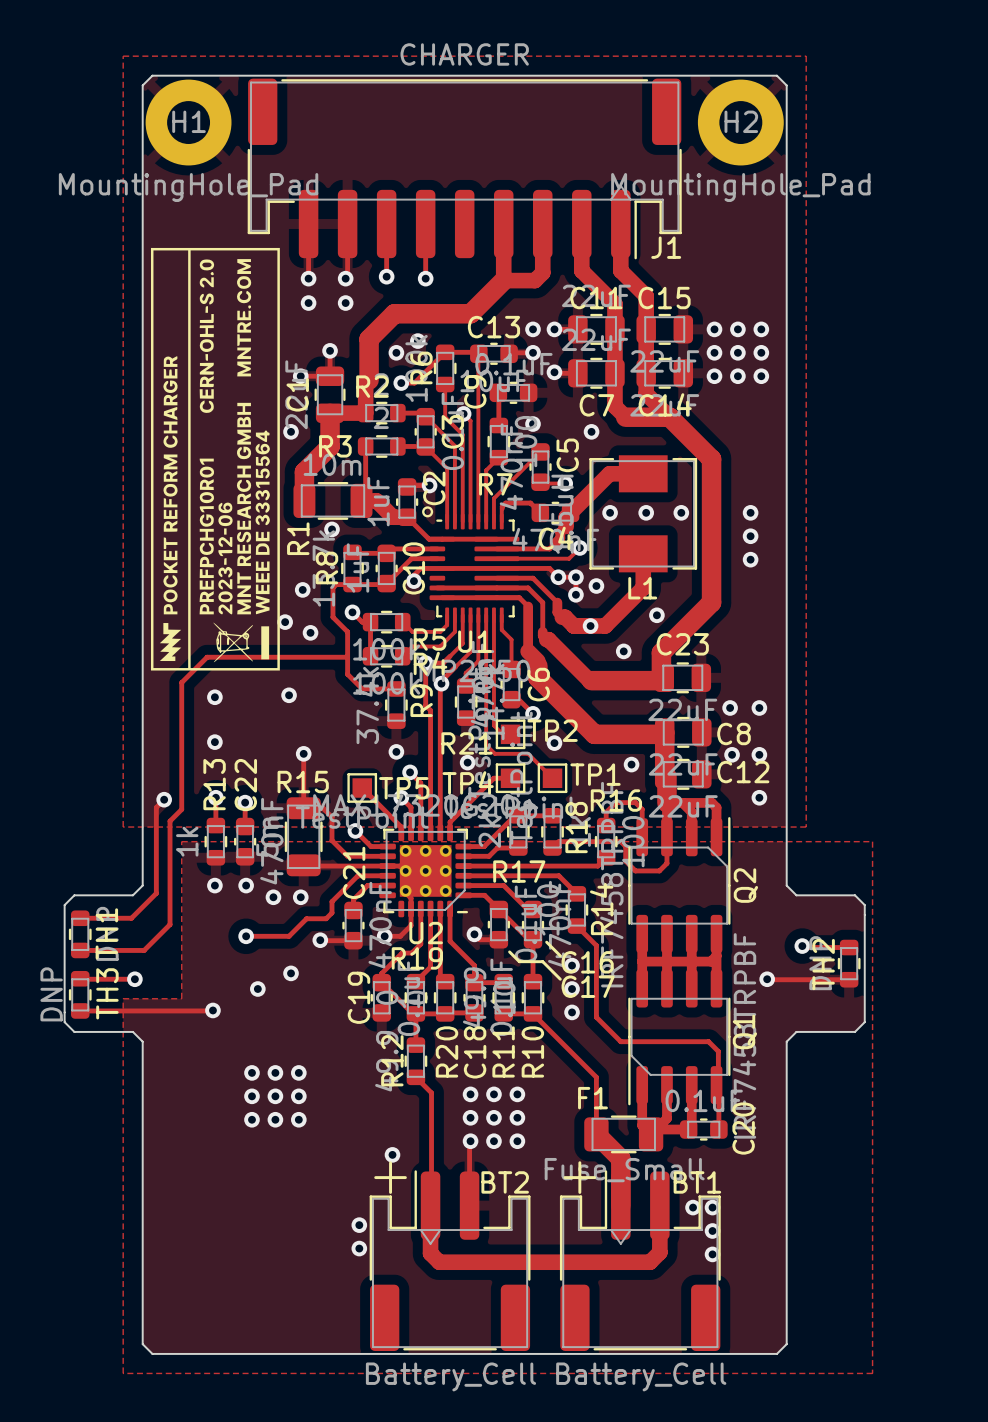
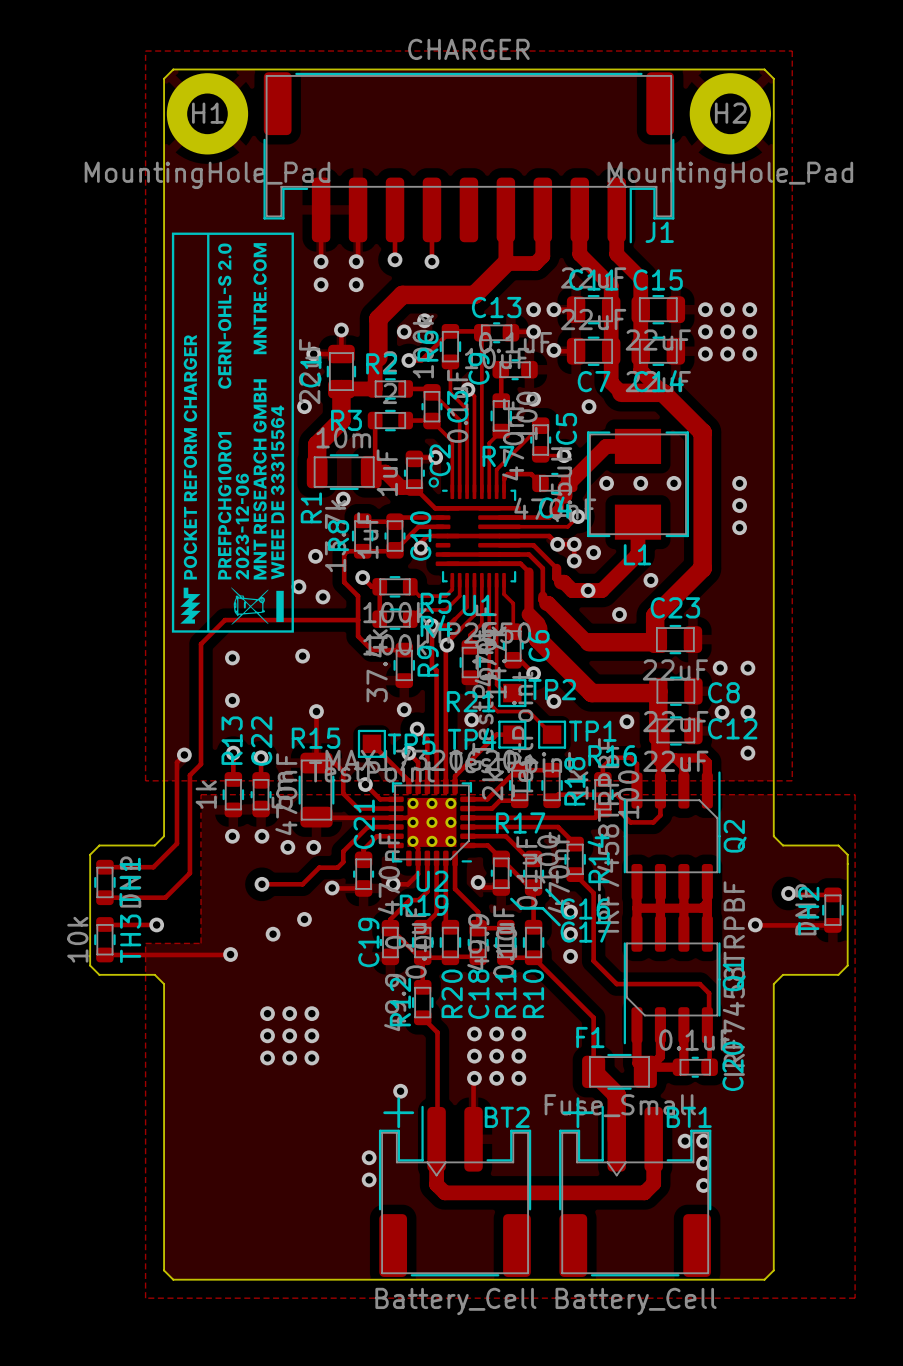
TH3 value: DNP (51, 994) -> 10k (77, 939)

